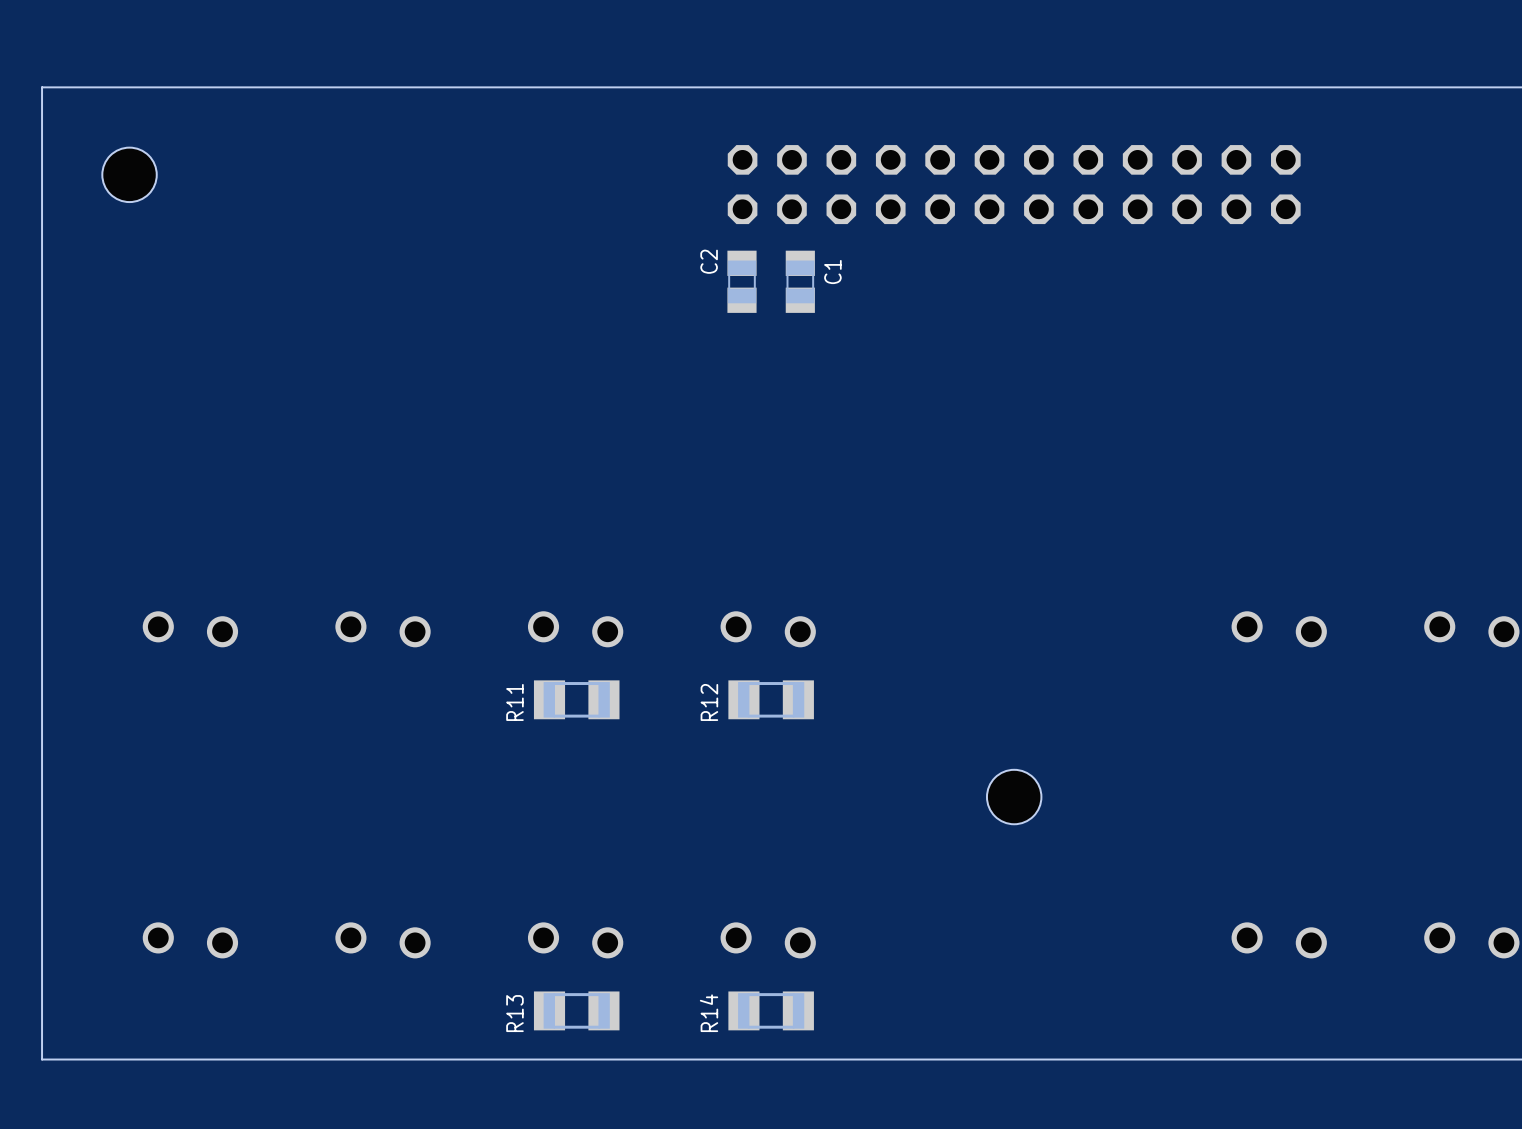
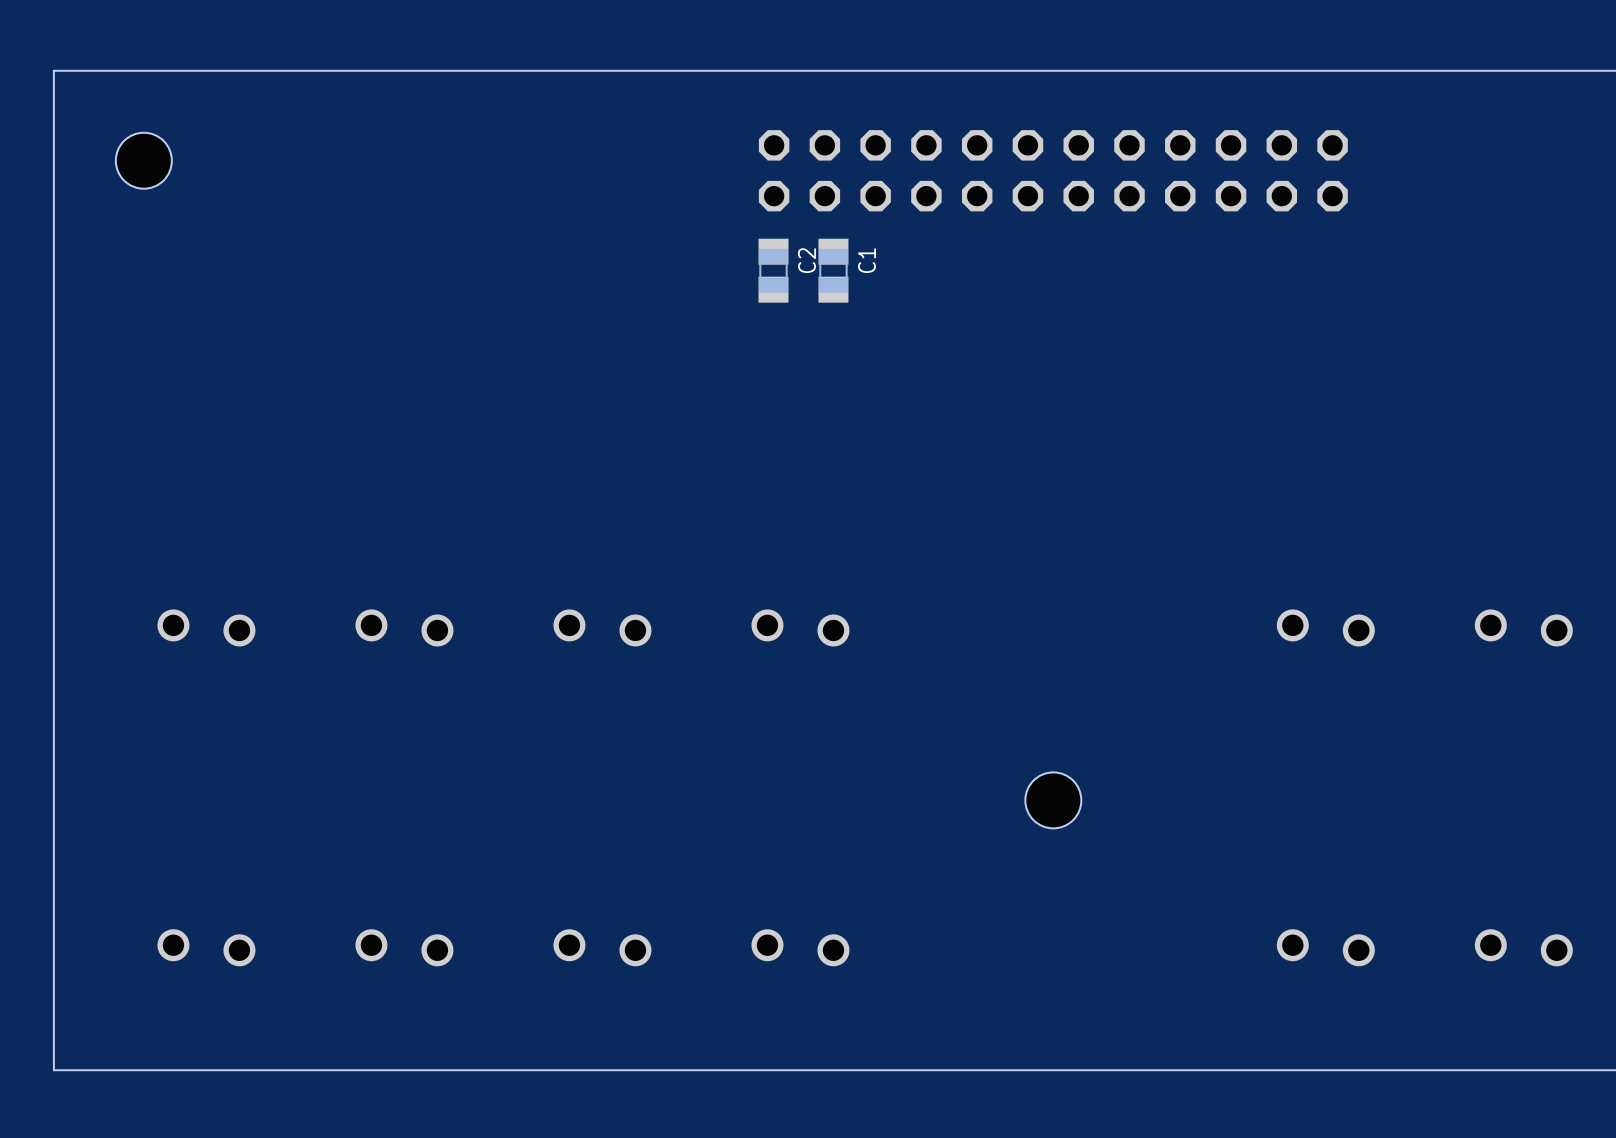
C2 name position: C2 (709, 261) -> C2 (807, 260)
R11: (576, 699) -> none
R12: (771, 699) -> none
R13: (576, 1010) -> none
R14: (771, 1010) -> none

